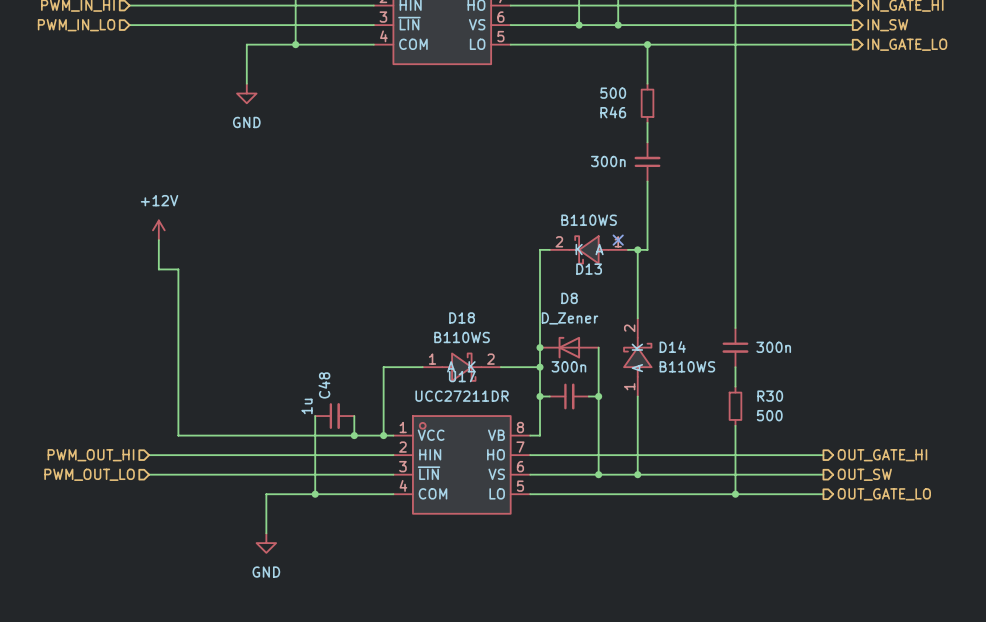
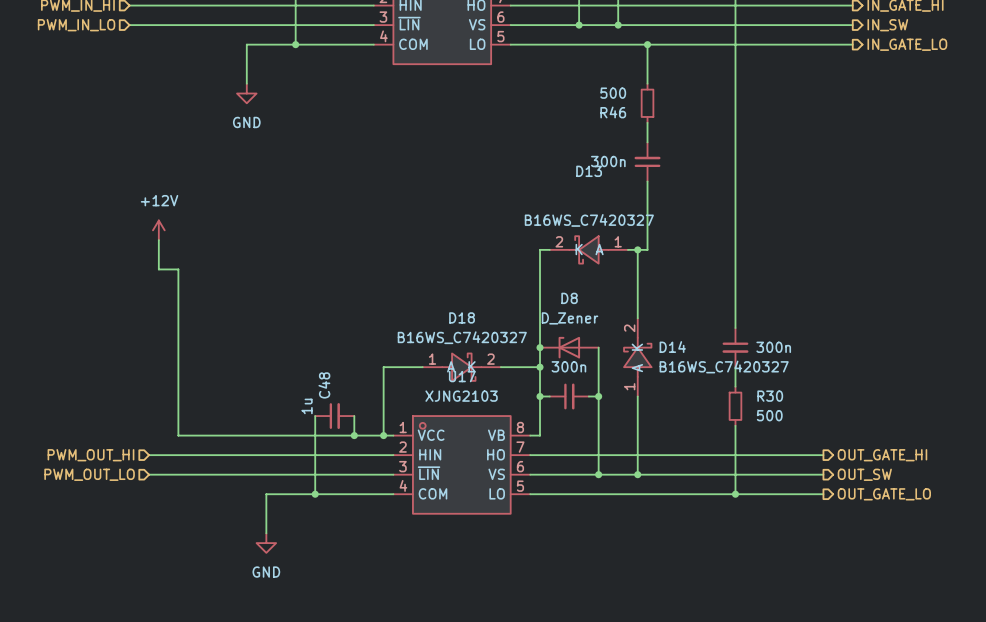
D13 value: B110WS (589, 220) -> B16WS_C7420327 (589, 220)
no-connect mark: (618, 240) -> none
D13 name position: D13 (589, 269) -> D13 (589, 171)
D18 value: B110WS (462, 337) -> B16WS_C7420327 (462, 337)
D14 value: B110WS (687, 366) -> B16WS_C7420327 (724, 367)
U17 value: UCC27211DR (462, 396) -> XJNG2103 (461, 396)

